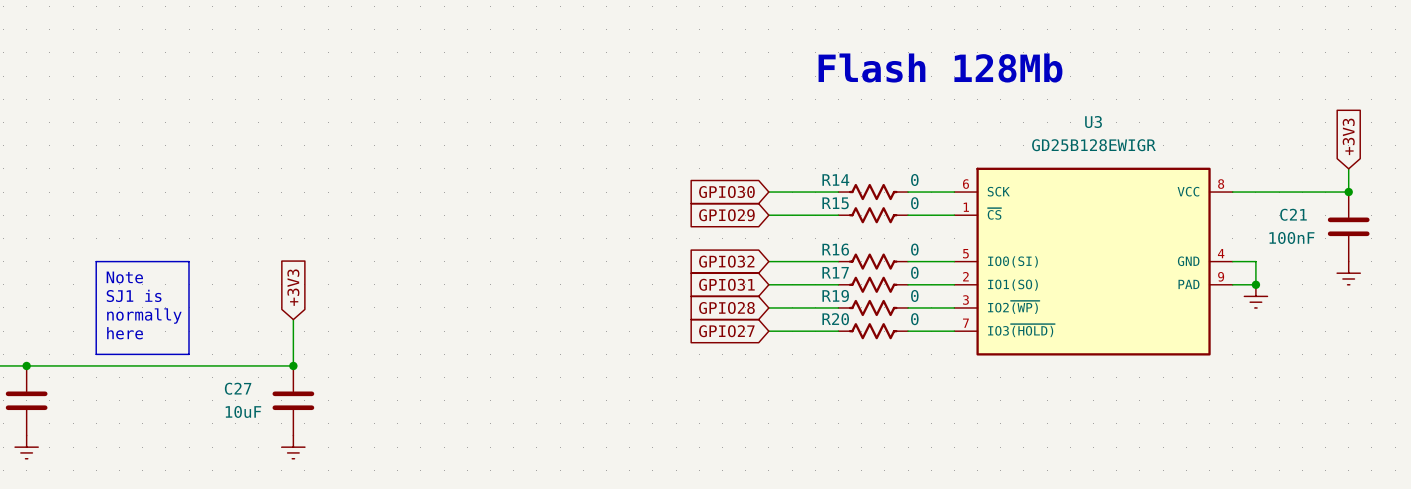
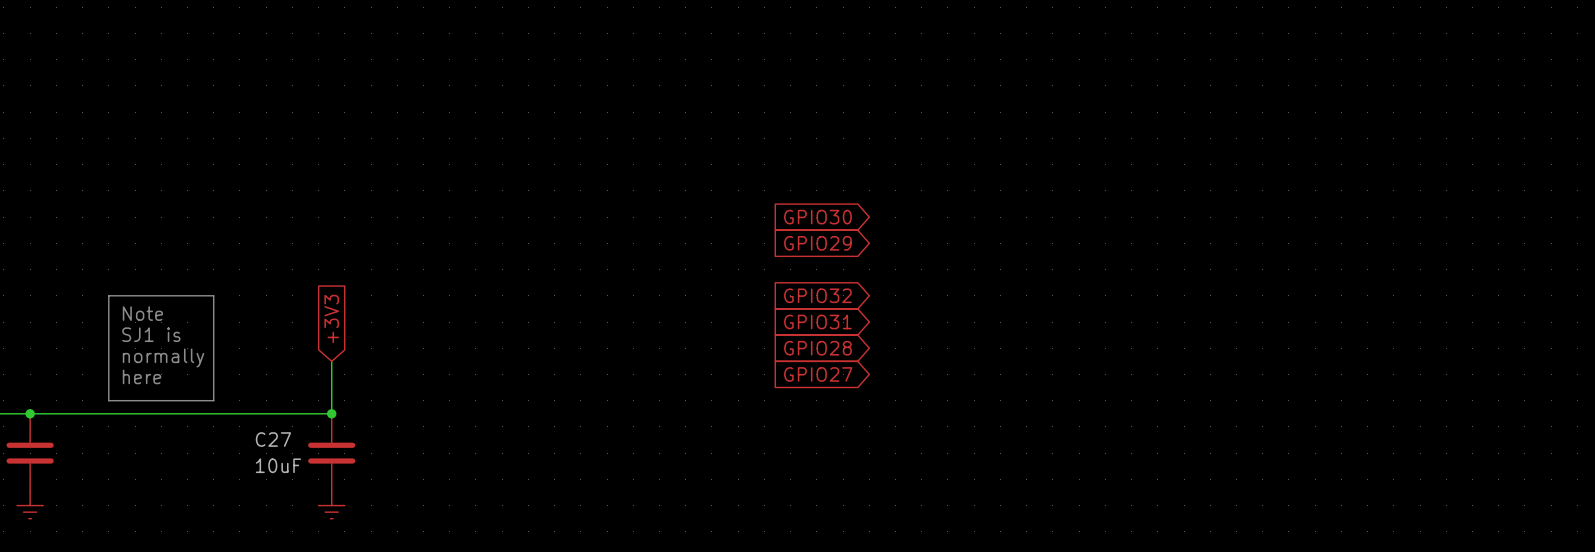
text: Flash 128Mb (940, 68) -> none
global label: +3V3 (1348, 136) -> none
wire: (1348, 168) (1348, 192) (1232, 192) -> none
wire: (768, 192) (838, 192) -> none
R14: 0 (873, 192) -> none
wire: (908, 192) (954, 192) -> none
junction: (1348, 192) -> none
wire: (768, 215) (838, 215) -> none
R15: 0 (873, 215) -> none
wire: (908, 215) (954, 215) -> none
C21: 100nF (1348, 226) -> none
wire: (768, 261) (838, 261) -> none
R16: 0 (873, 261) -> none
wire: (908, 261) (954, 261) -> none
U3: GD25B128EWIGR (1093, 261) -> none
wire: (1232, 261) (1255, 261) (1255, 284) (1232, 284) -> none
power symbol: (1348, 273) -> none
wire: (768, 284) (838, 284) -> none
R17: 0 (873, 284) -> none
wire: (908, 284) (954, 284) -> none
junction: (1255, 284) -> none
power symbol: (1255, 296) -> none
wire: (768, 307) (838, 307) -> none
R19: 0 (873, 307) -> none
wire: (908, 307) (954, 307) -> none
wire: (768, 331) (838, 331) -> none
R20: 0 (873, 331) -> none
wire: (908, 331) (954, 331) -> none

